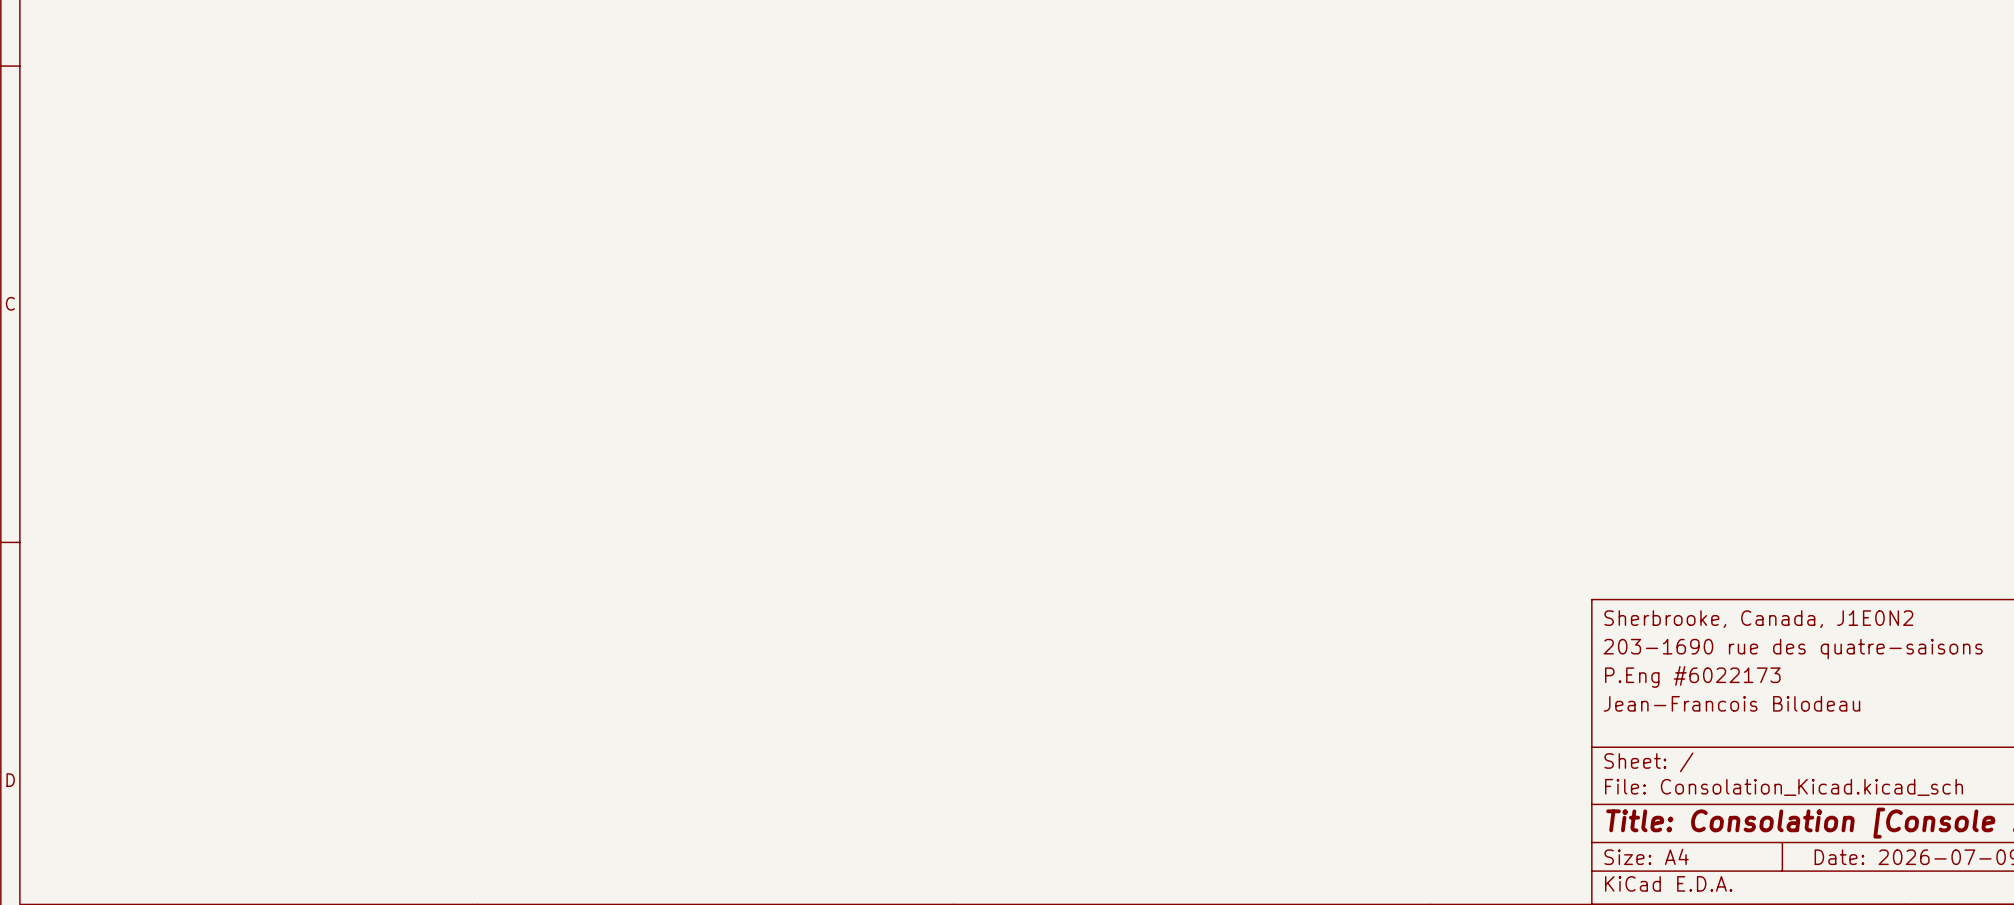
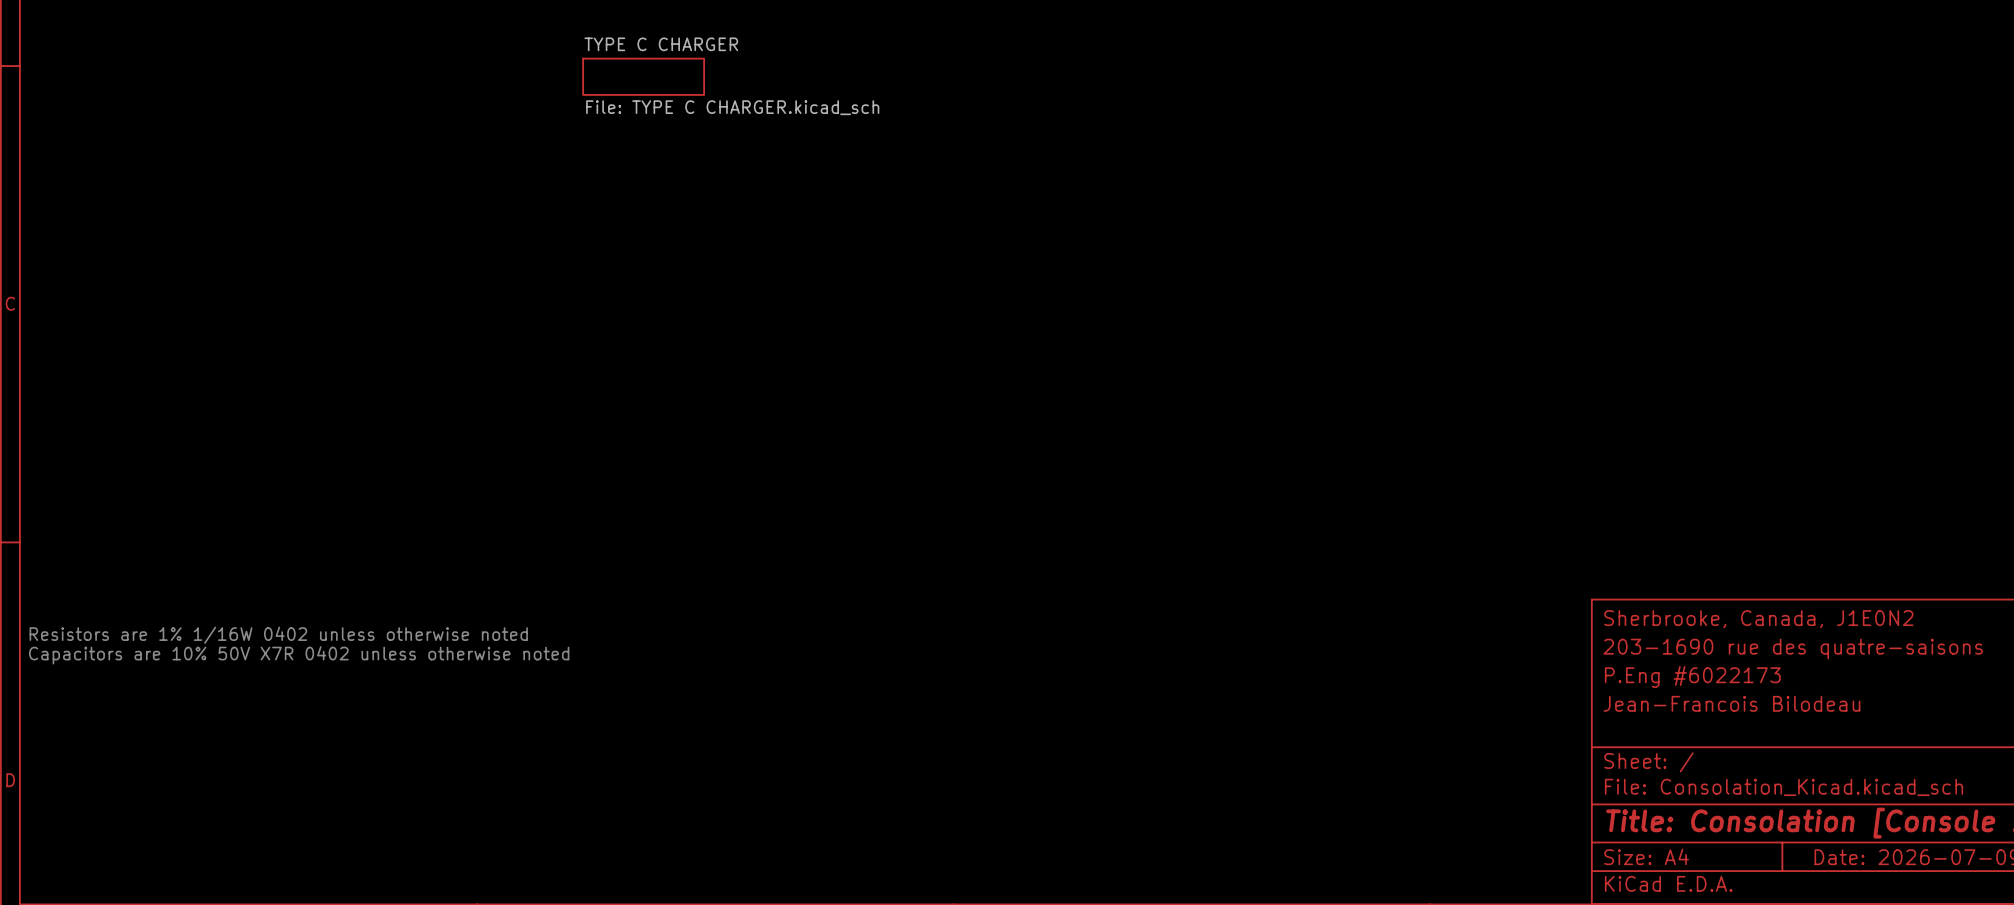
sheet TYPE C CHARGER: none -> File: TYPE C CHARGER.kicad_sch (643, 76)
text: none -> Resistors are 1% 1/16W 0402 unless otherwise noted (278, 635)
text: none -> Capacitors are 10% 50V X7R 0402 unless otherwise noted (299, 655)

